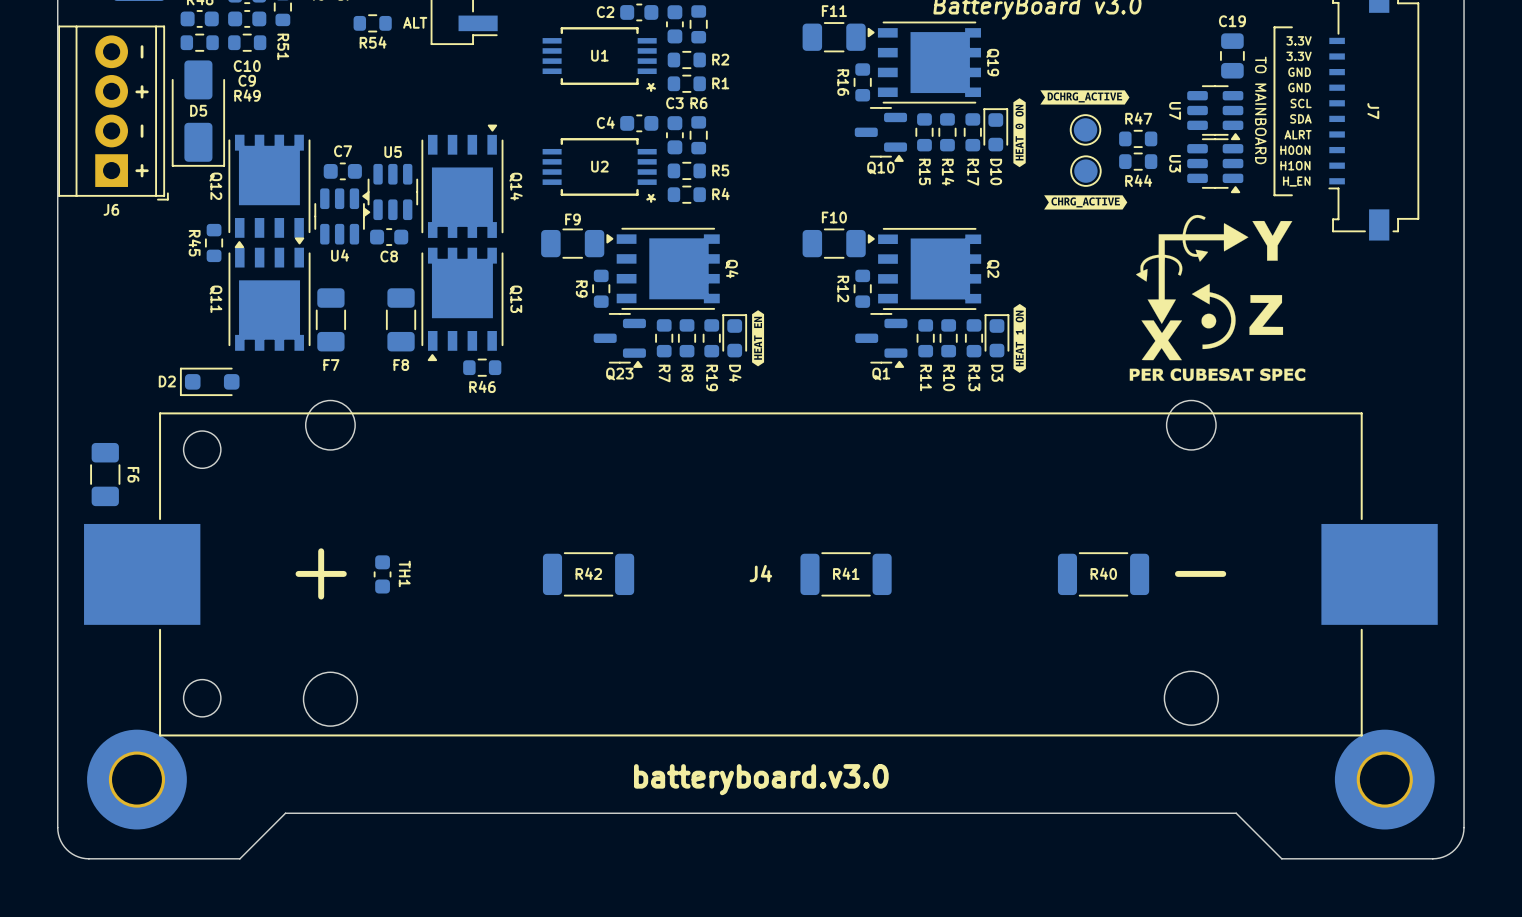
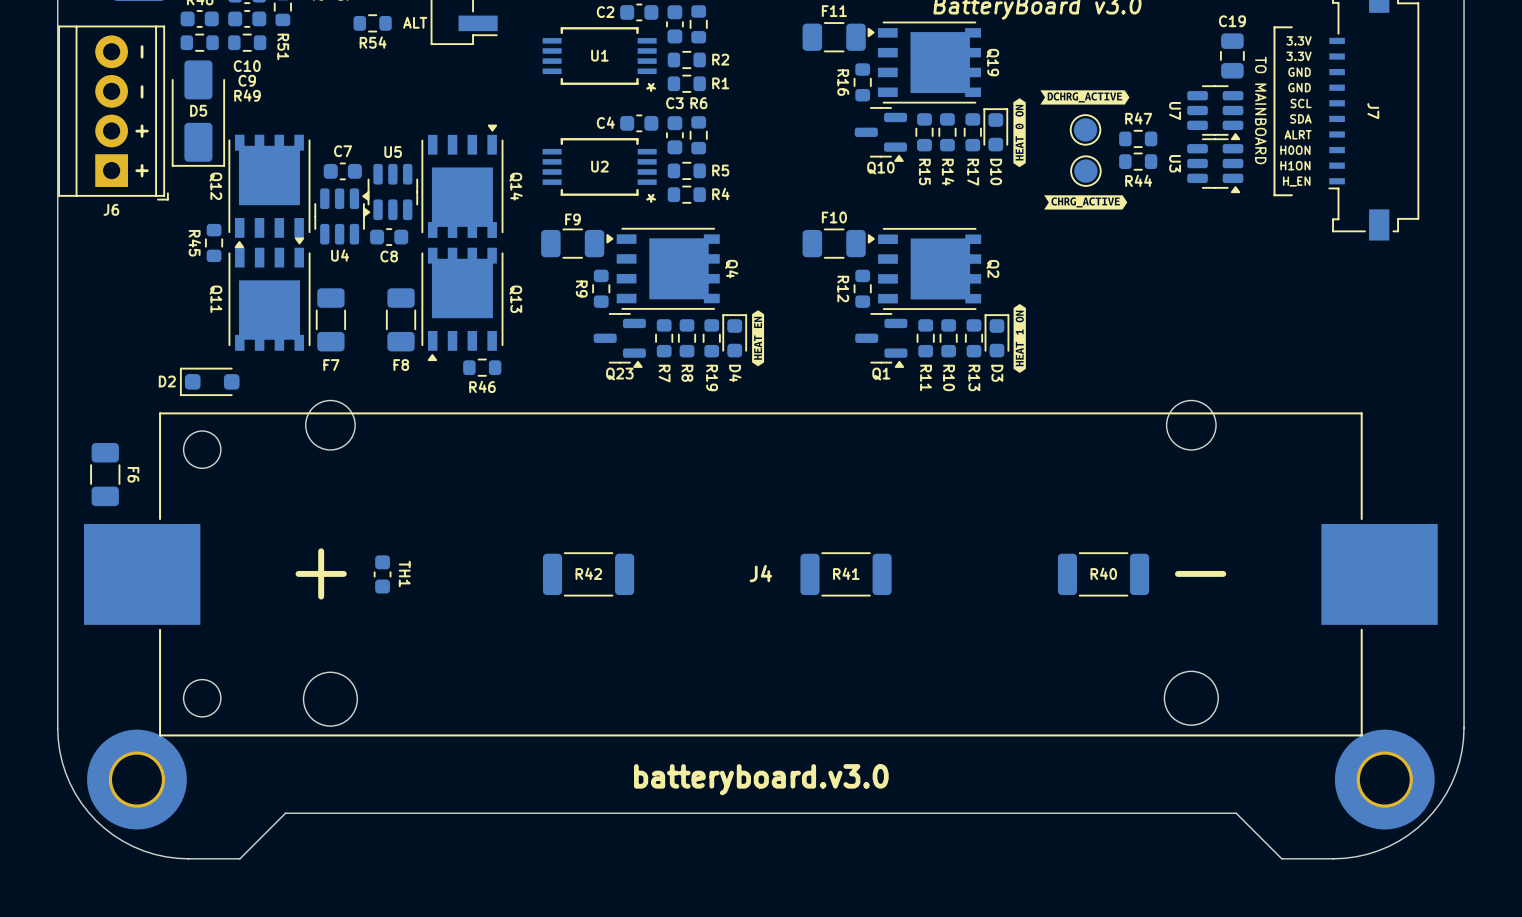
text: + (142, 91) -> - (142, 91)
text: - (142, 131) -> + (142, 131)
drawing: [1129, 214, 1306, 382] -> none
board edge: (57, 728) (57, 831) (60, 841) (66, 849) (75, 855) (85, 858) (188, 858) -> (57, 728) (62, 761) (69, 783) (81, 803) (96, 820) (113, 835) (133, 846) (154, 854) (188, 858)
board edge: (1464, 728) (1463, 831) (1460, 841) (1454, 849) (1446, 855) (1436, 858) (1333, 858) -> (1464, 728) (1462, 750) (1456, 772) (1446, 793) (1425, 820) (1398, 841) (1378, 850) (1355, 856) (1333, 858)

